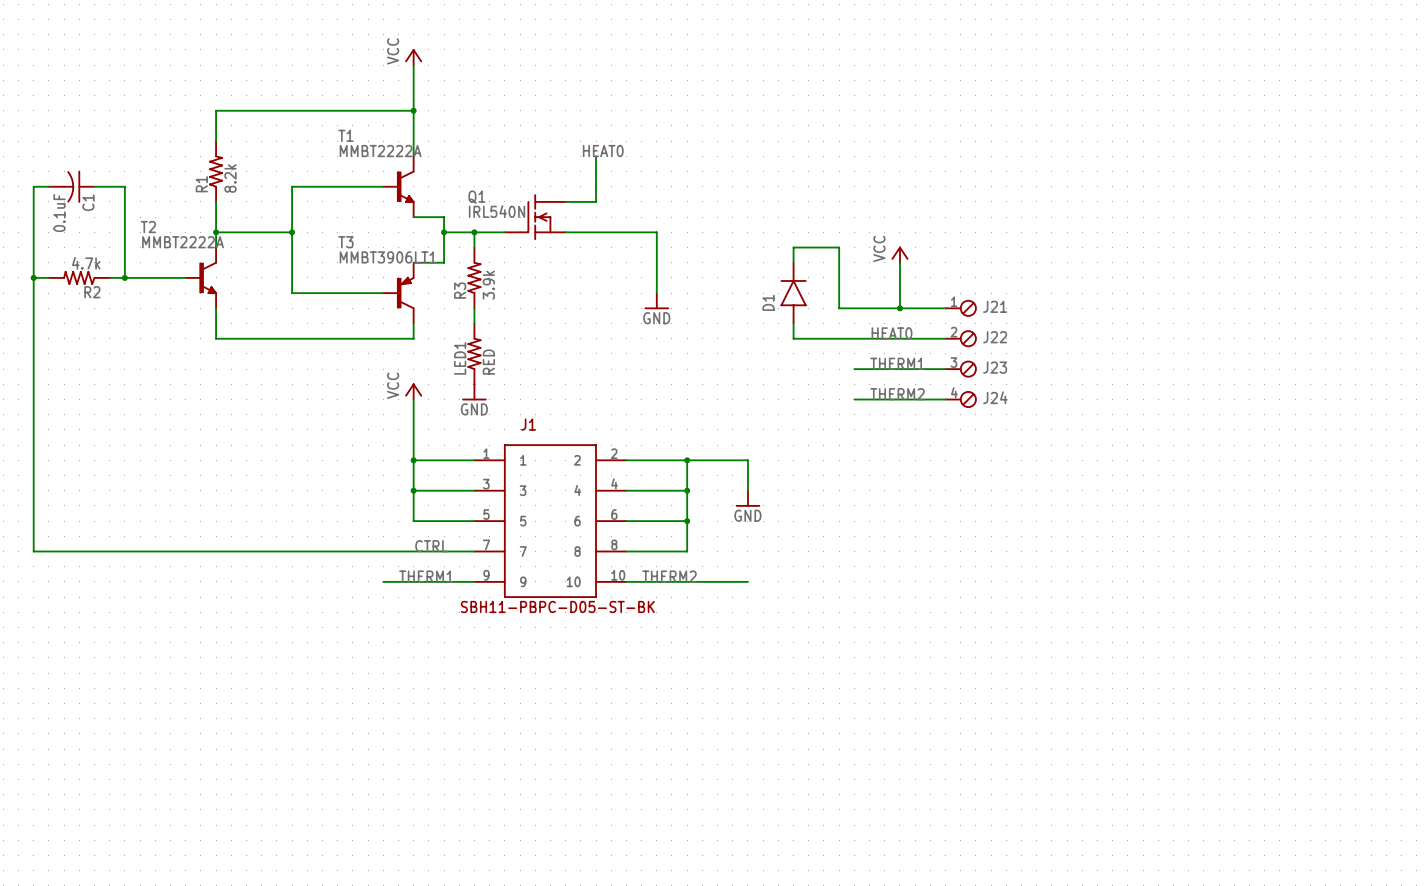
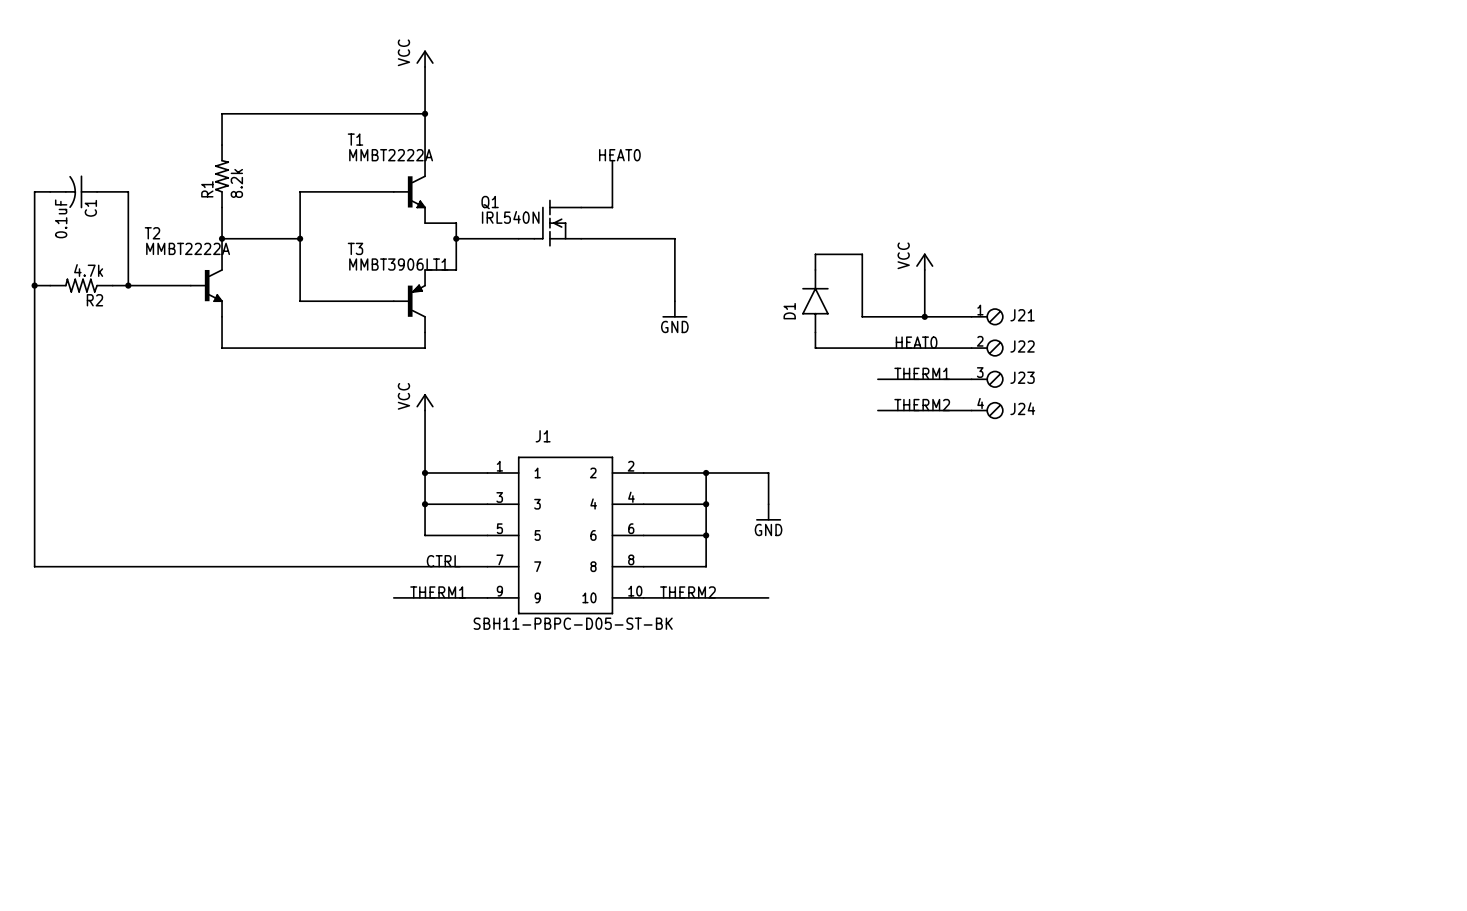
wire: (474, 232) (474, 247) -> none
junction: (474, 232) -> none
R3: 3.9k (474, 277) -> none
wire: (474, 308) (474, 323) -> none
LED1: RED (474, 353) -> none
power symbol: GND (474, 392) -> none

